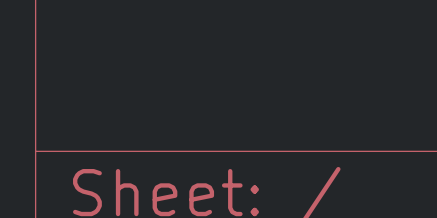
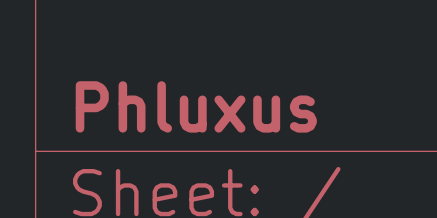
title block: none -> Phluxus (196, 106)

